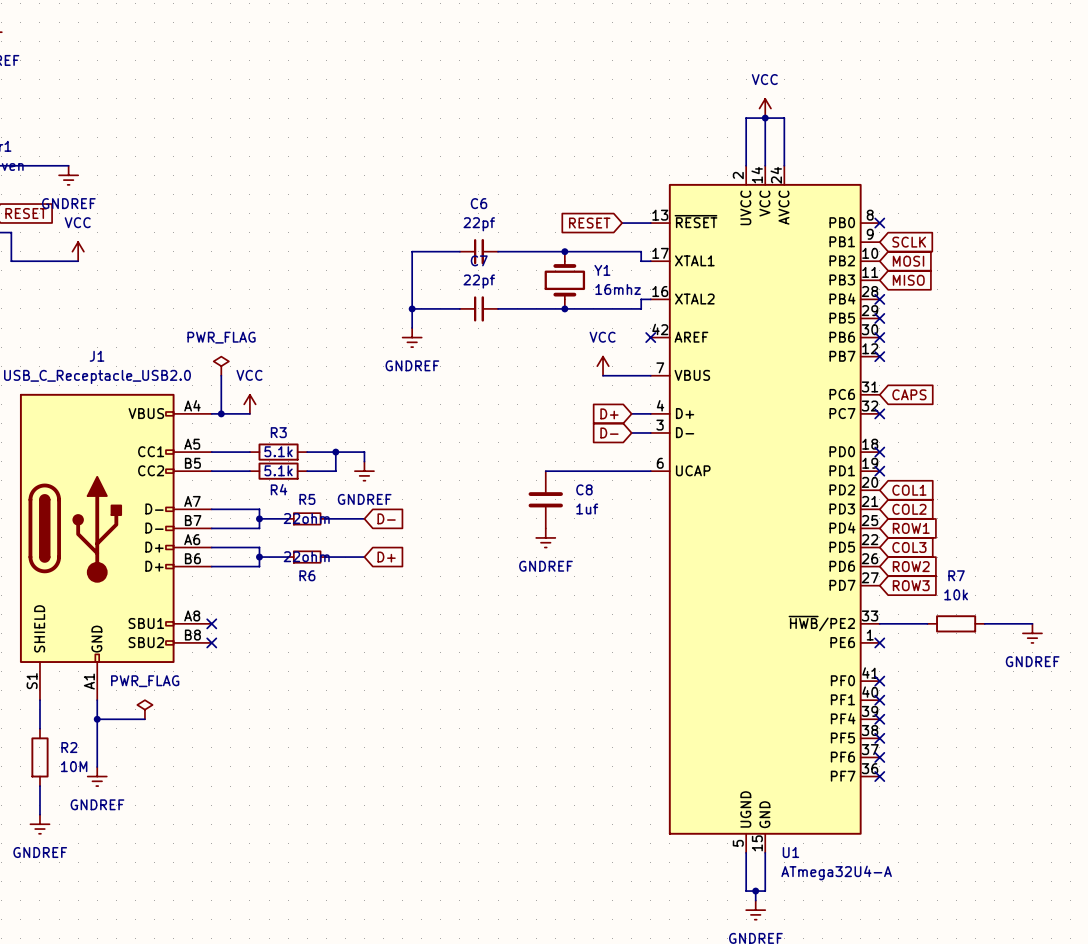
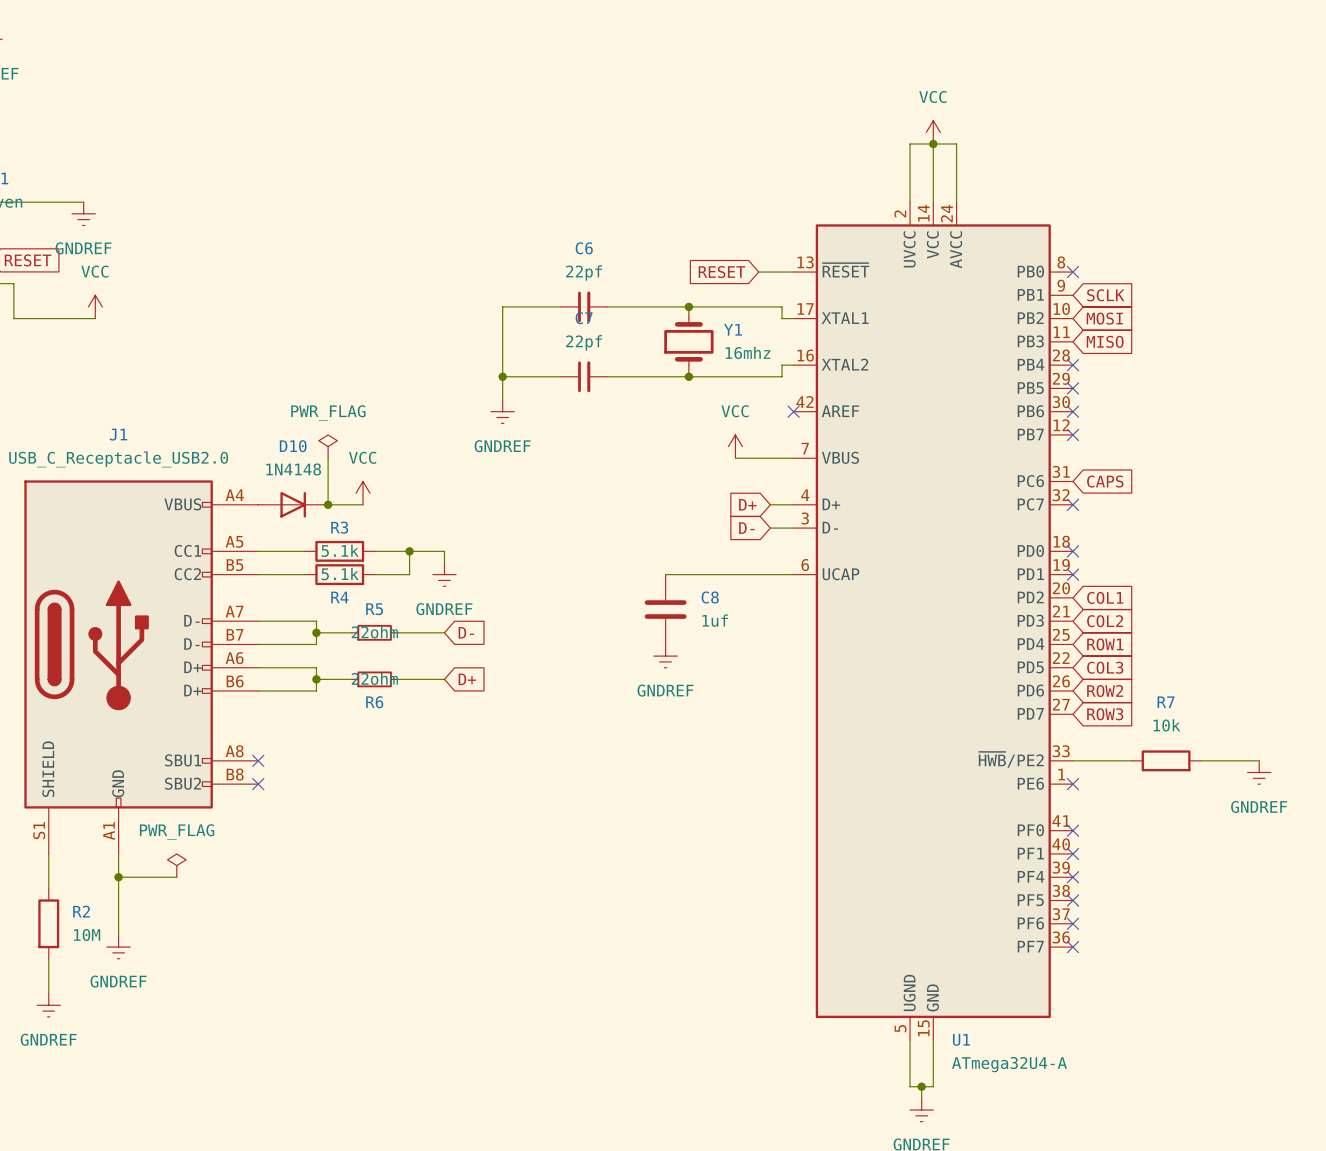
power symbol position: PWR_FLAG (221, 366) -> PWR_FLAG (328, 446)
wire: (221, 375) (221, 413) -> none
wire: none -> (328, 458) (328, 504) (363, 504)
power symbol position: VCC (249, 404) -> VCC (363, 493)
junction: (221, 413) -> none
D10: none -> 1N4148 (293, 504)
junction: none -> (328, 504)

